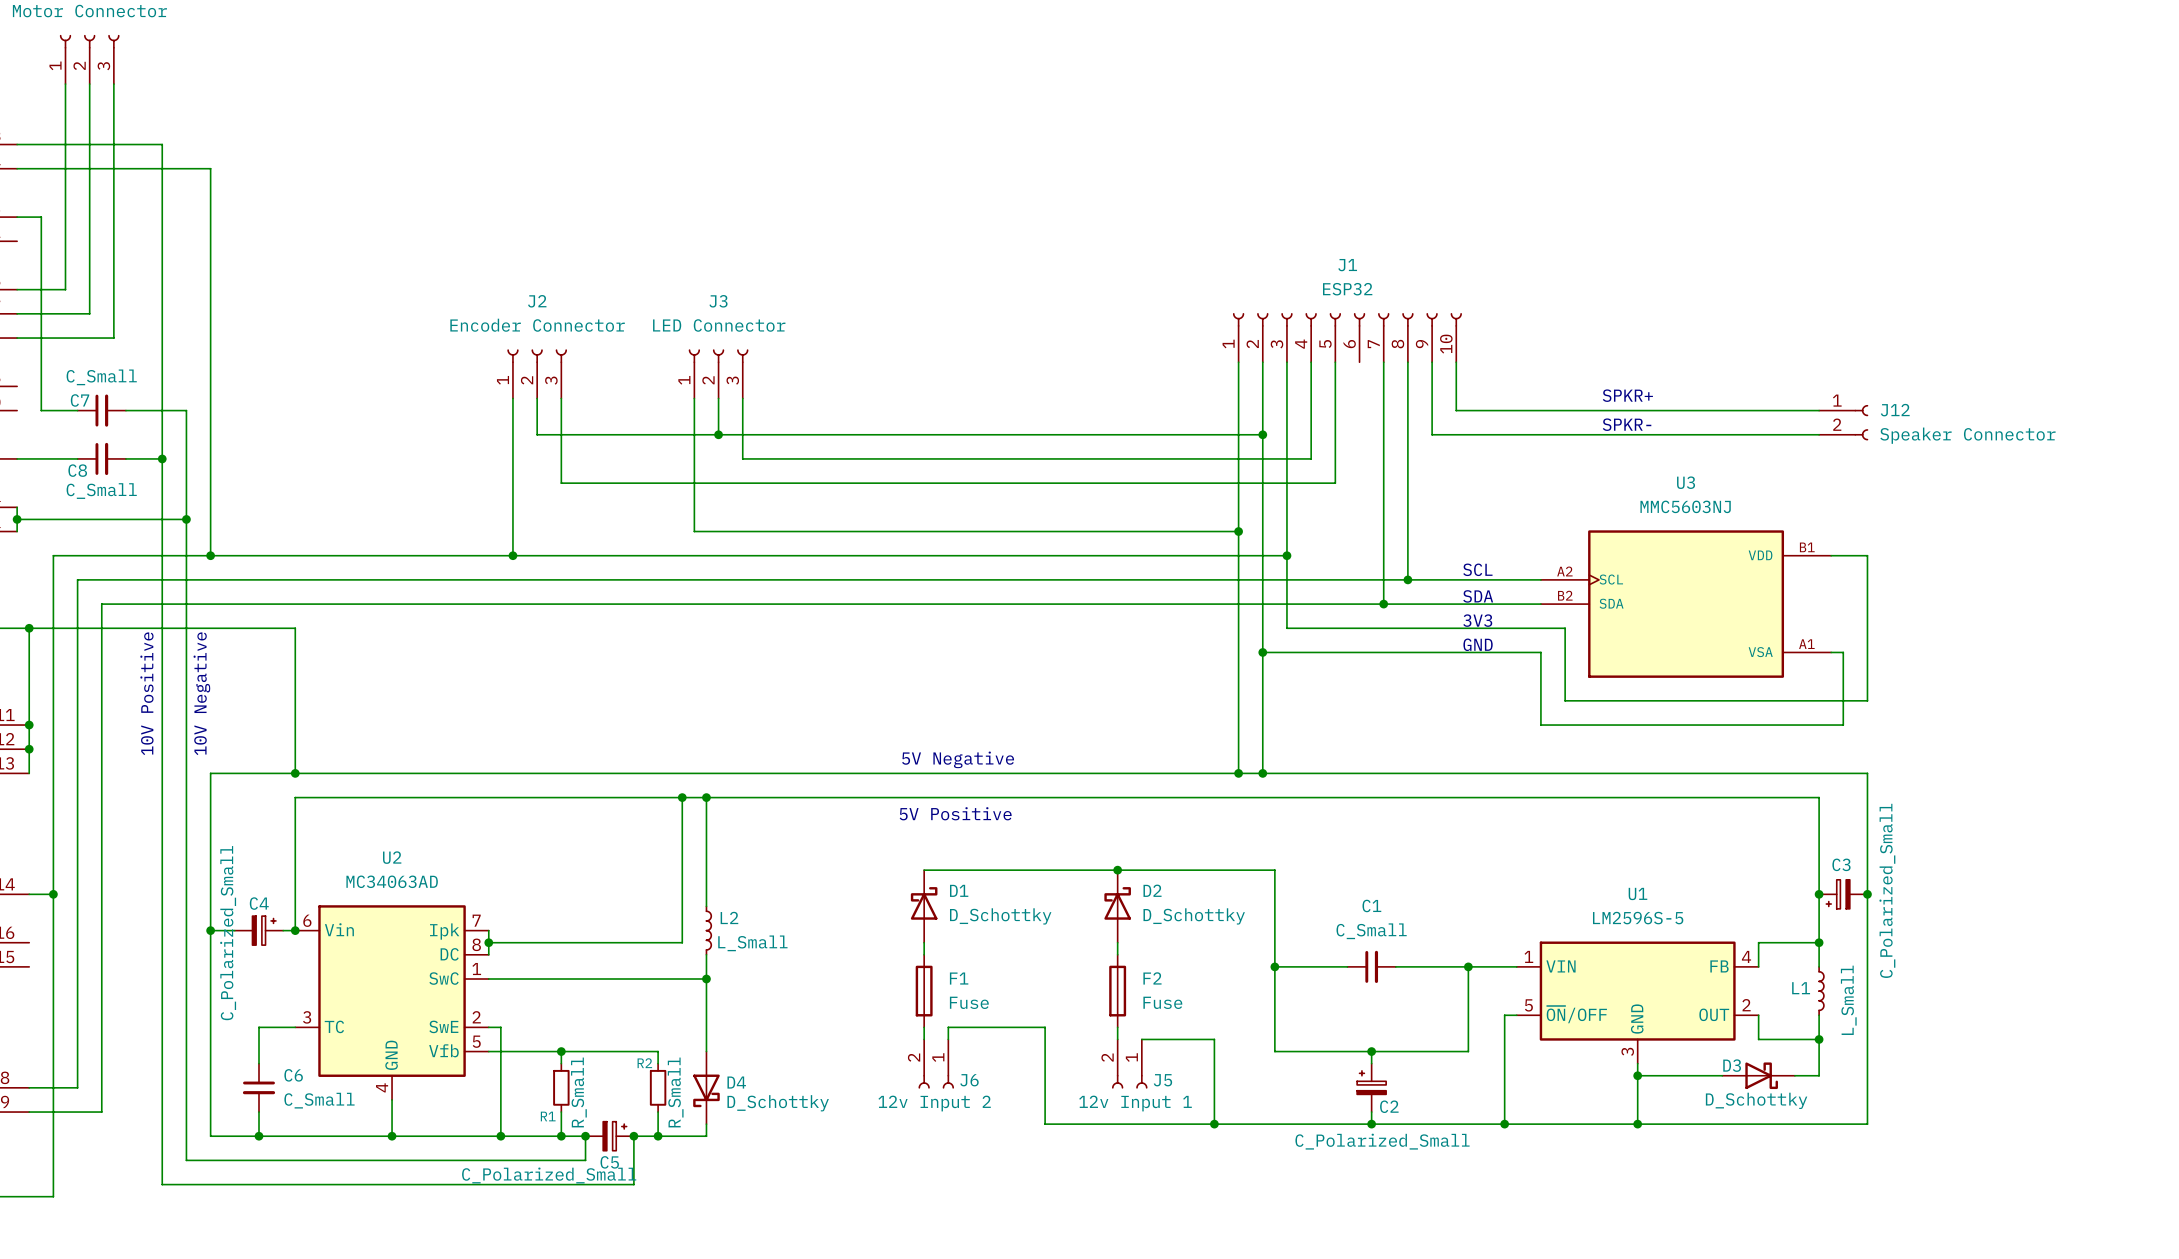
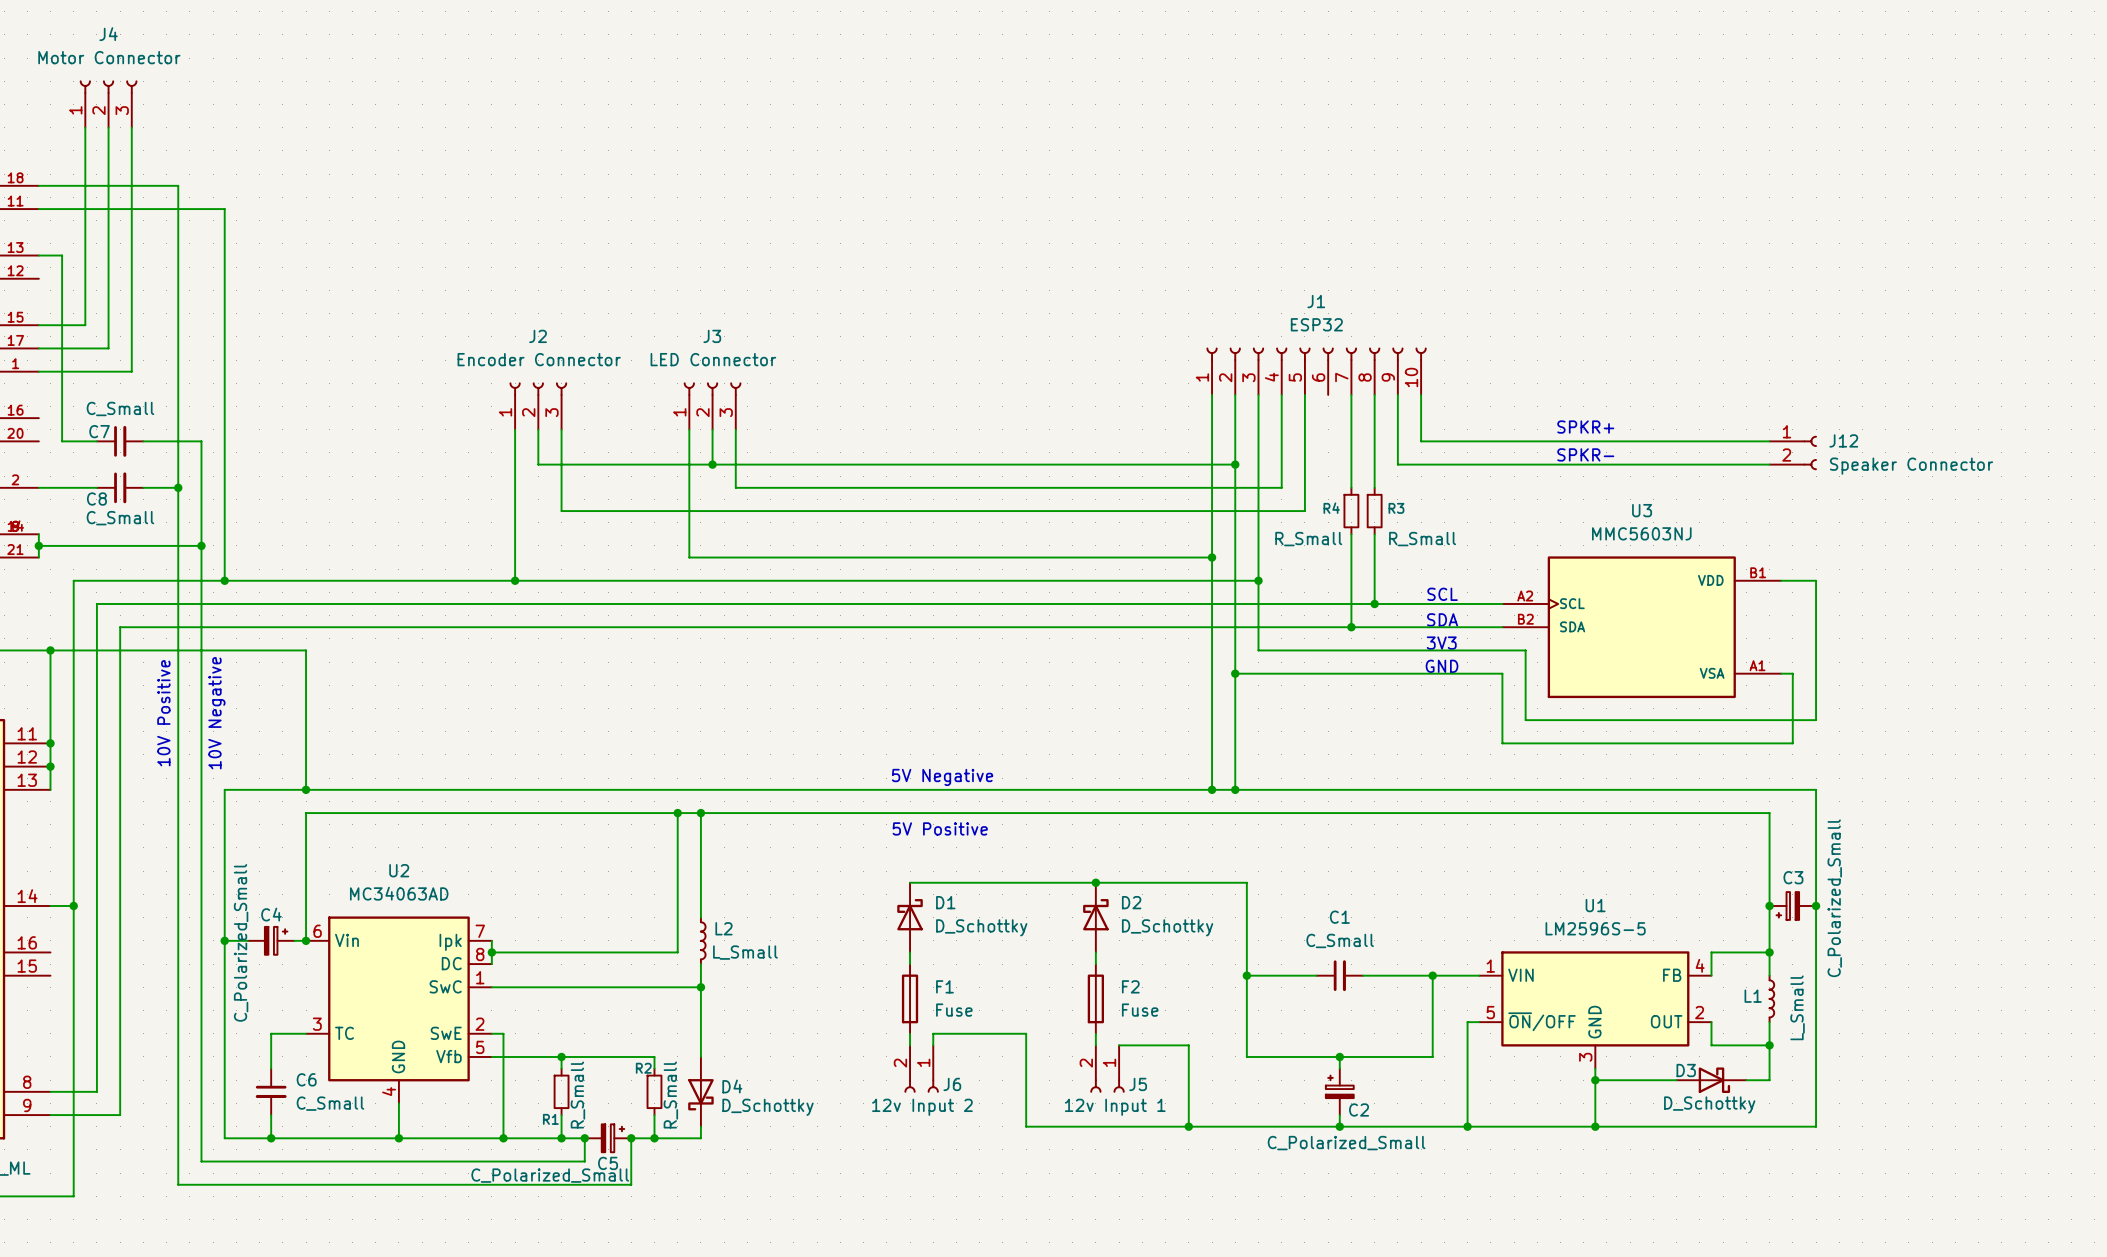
wire: (1383, 458) (1383, 507) -> none
wire: (1407, 458) (1407, 507) -> none
R4: none -> R_Small (1351, 511)
R3: none -> R_Small (1374, 511)

